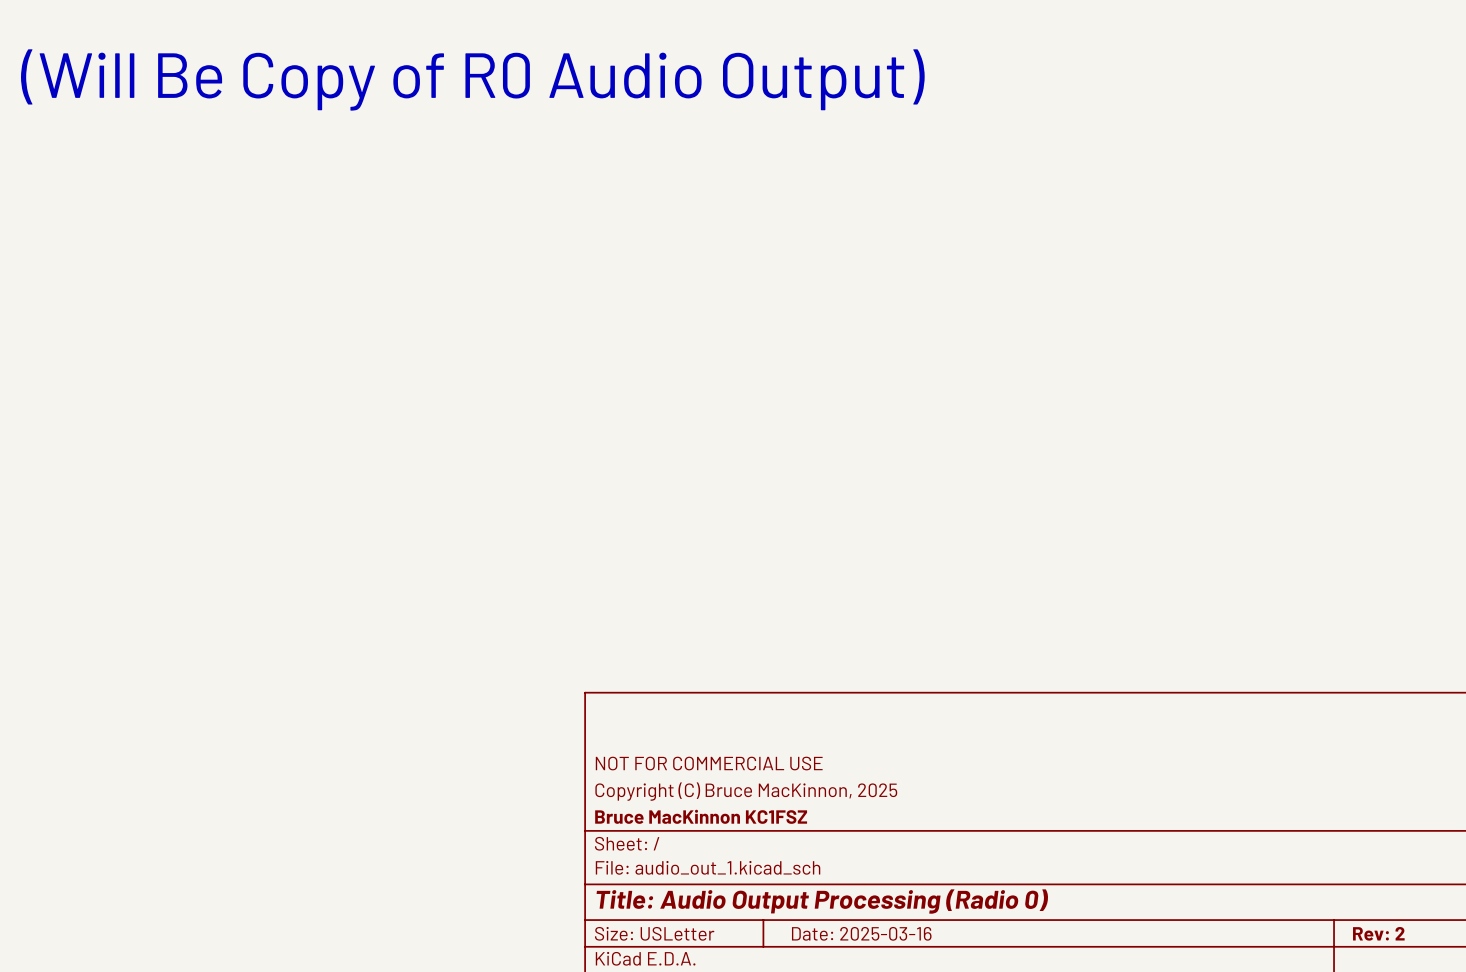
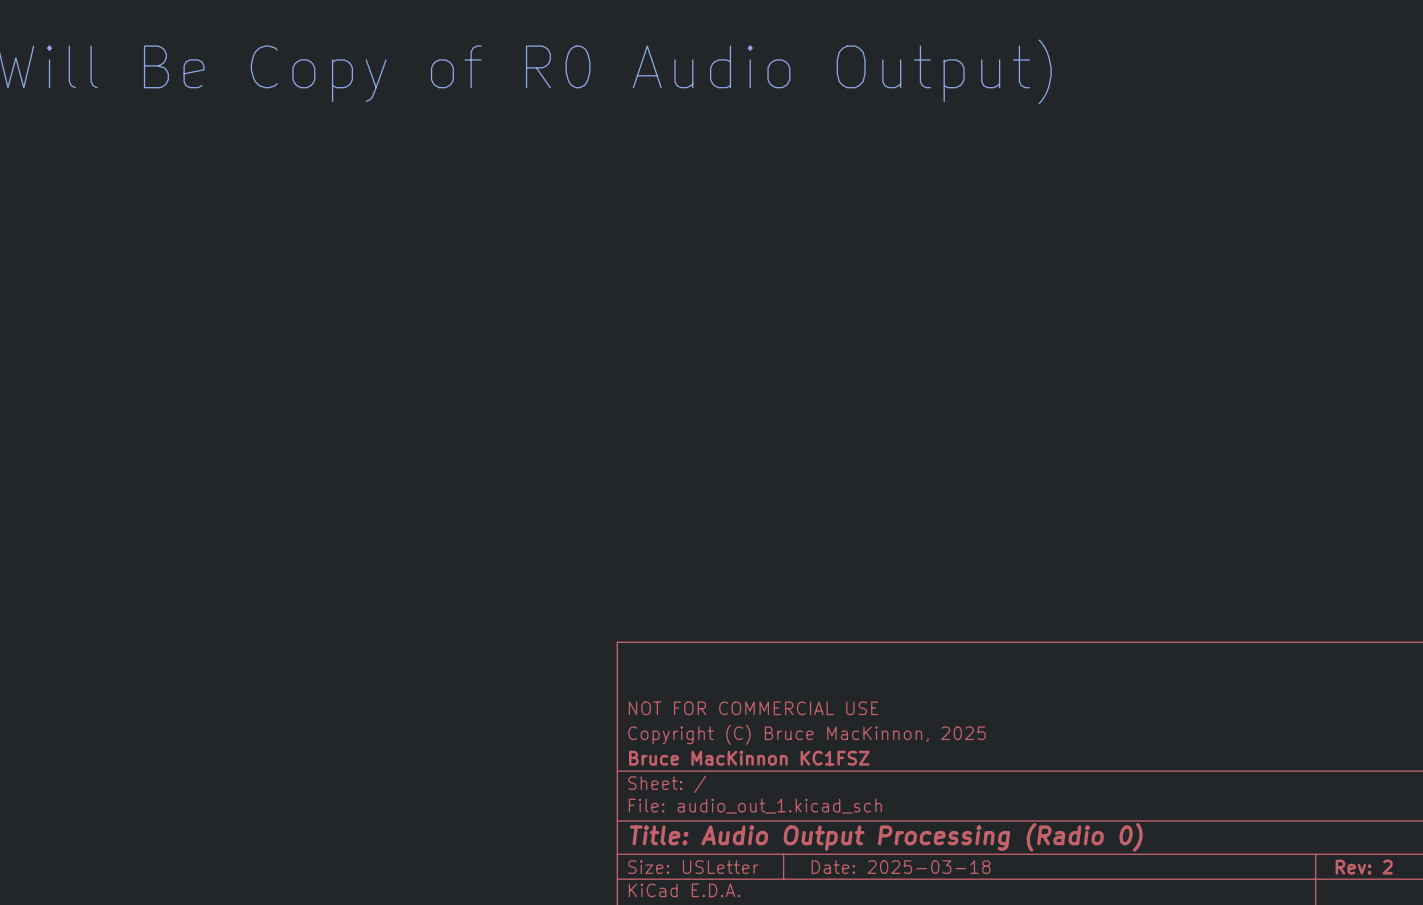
title block: Date: 2025-03-16 (861, 933) -> Date: 2025-03-18 (901, 867)

